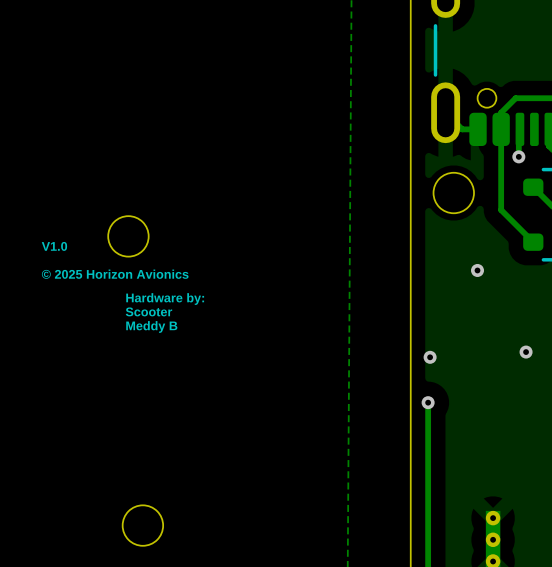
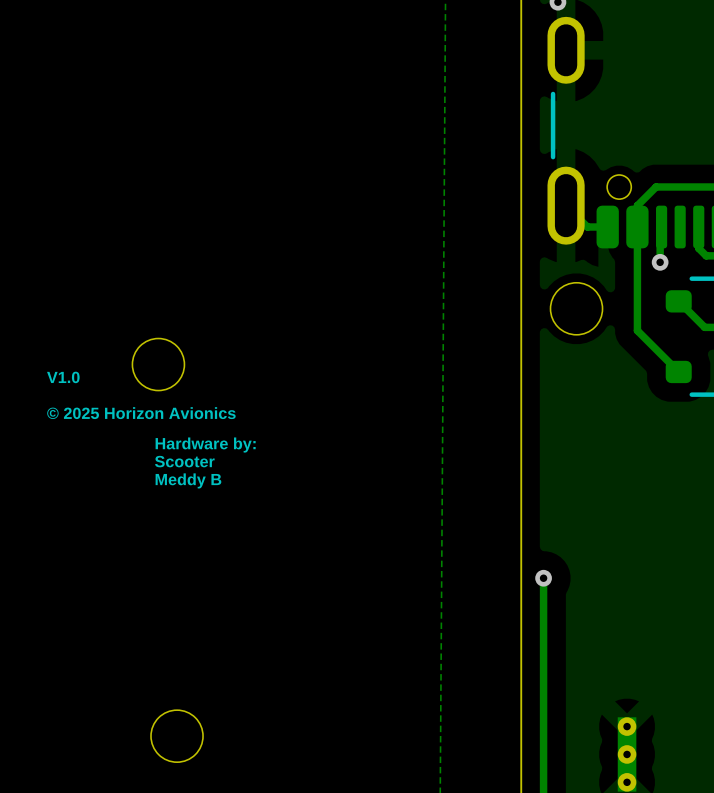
via: (477, 270) -> none
via: (526, 352) -> none
via: (430, 357) -> none

